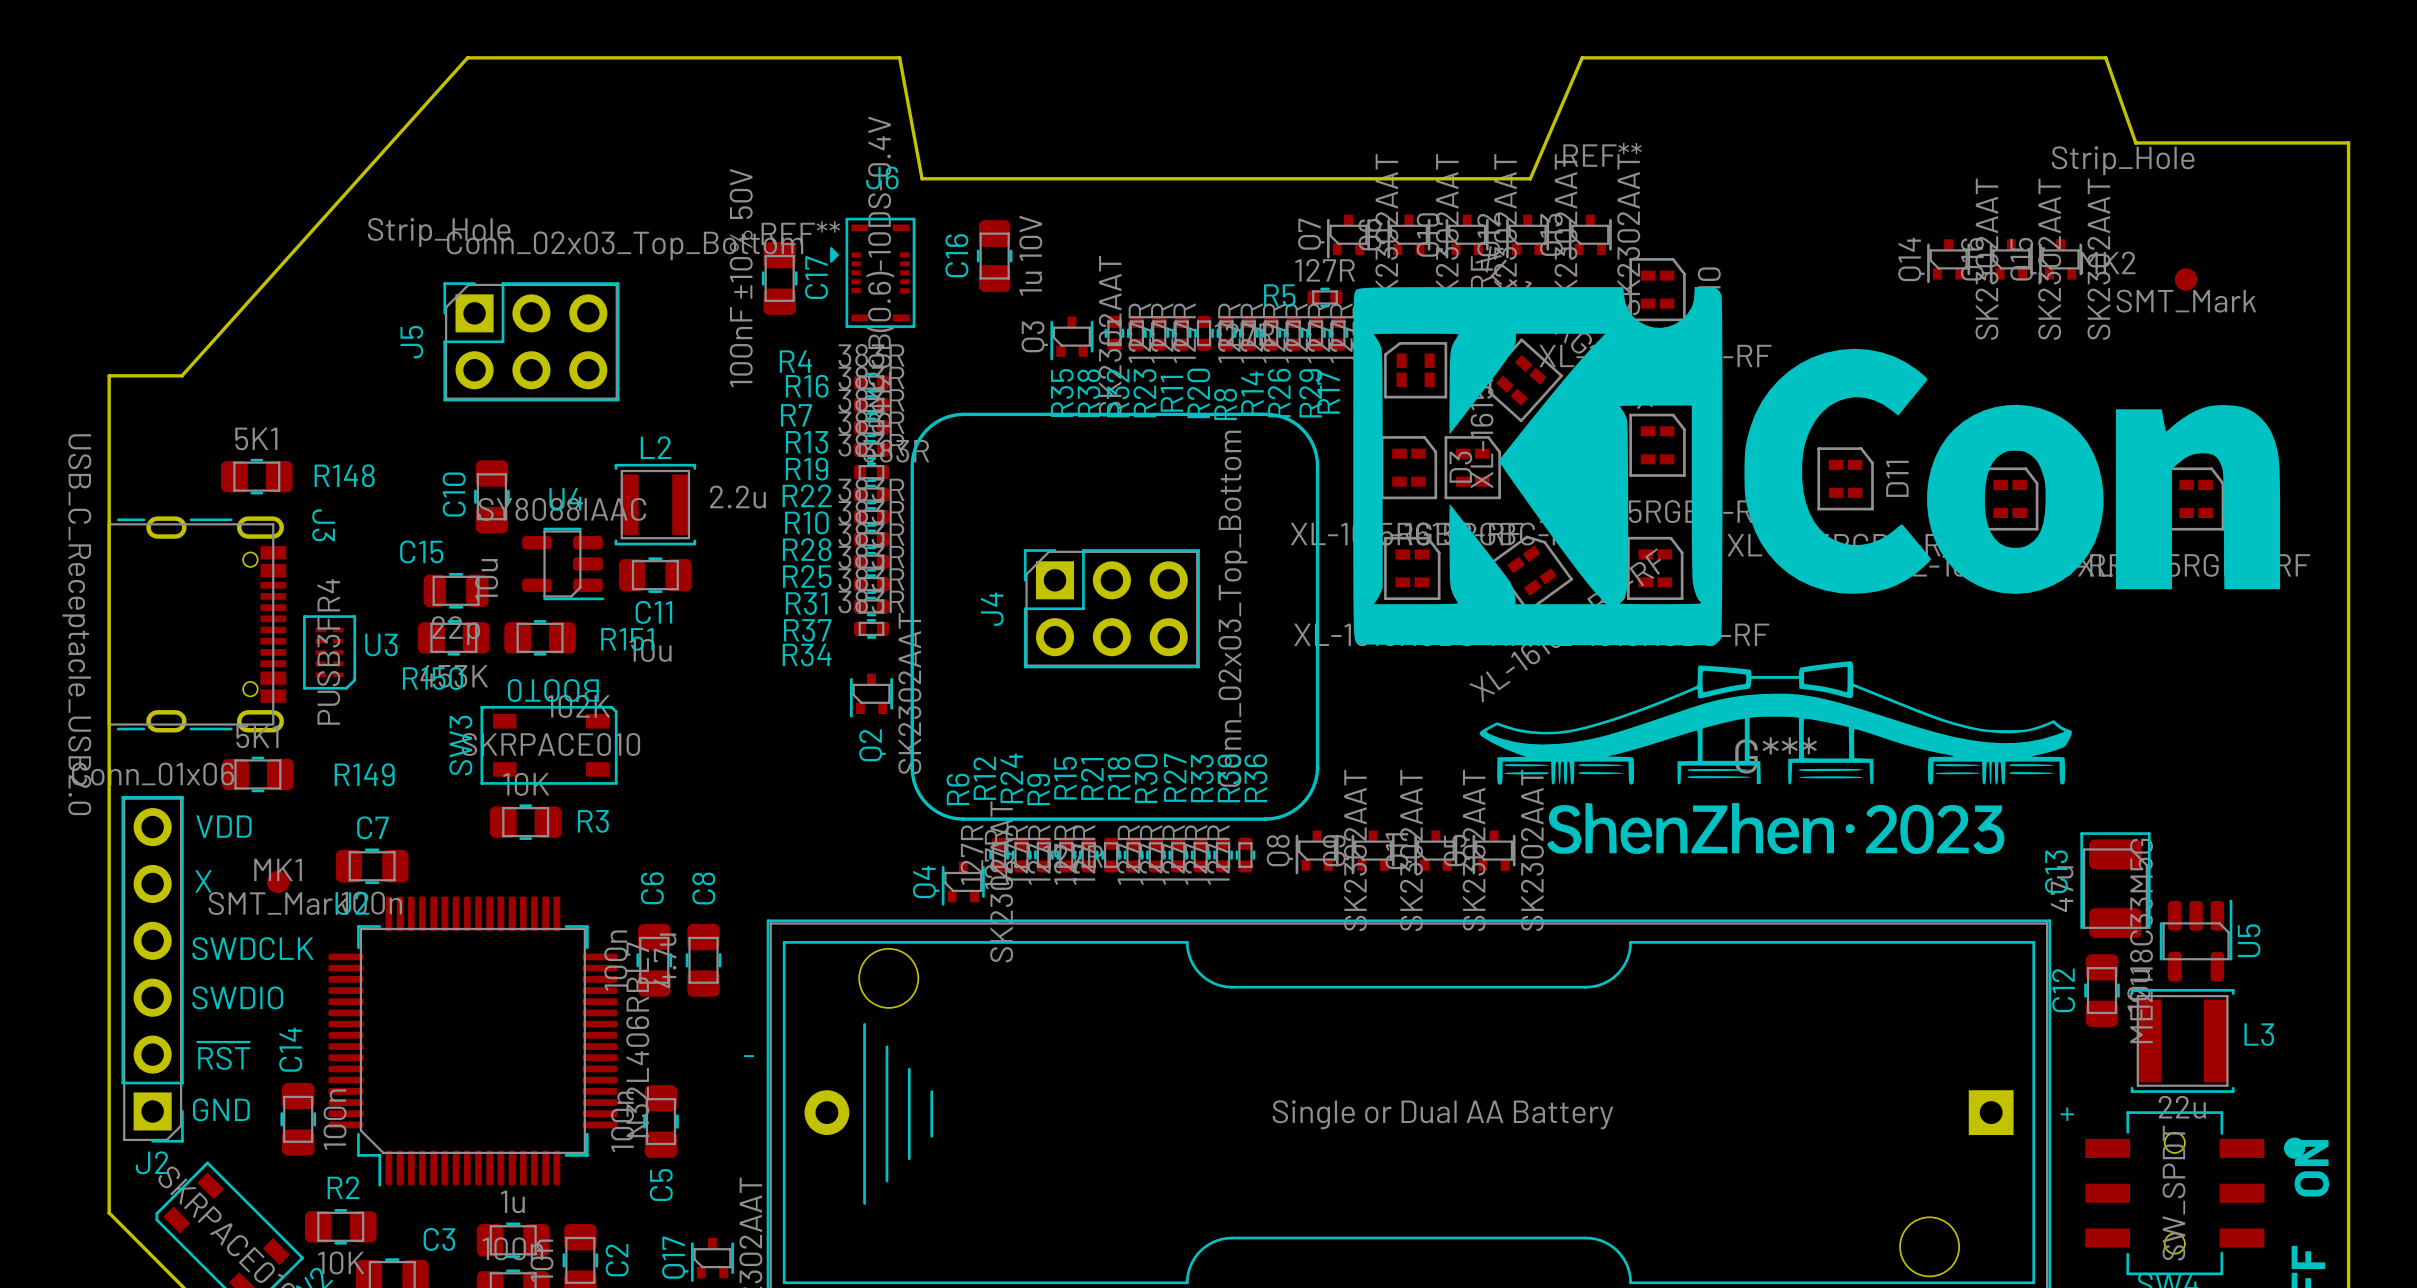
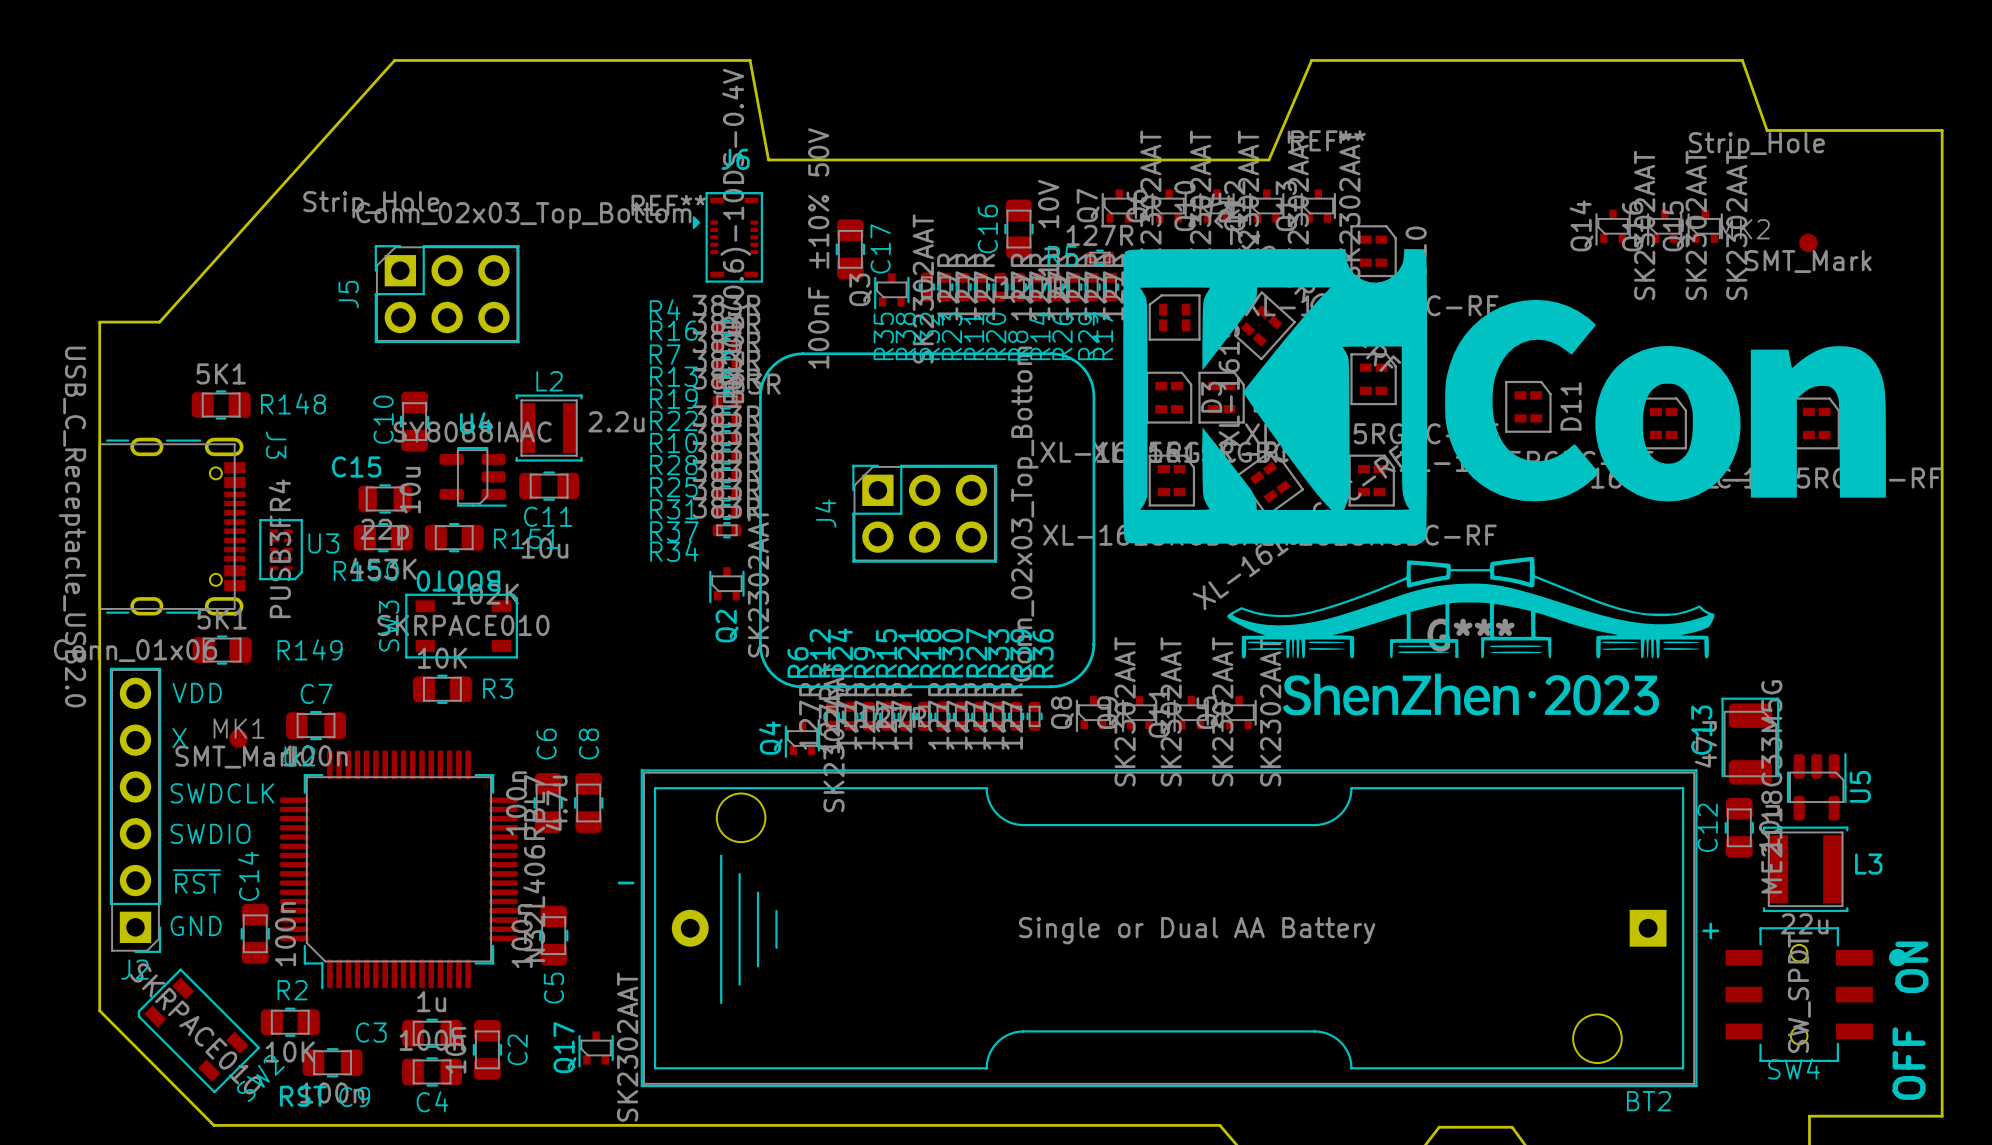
C16 position: (994, 256) -> (1018, 229)
C17 position: (779, 278) -> (850, 249)

